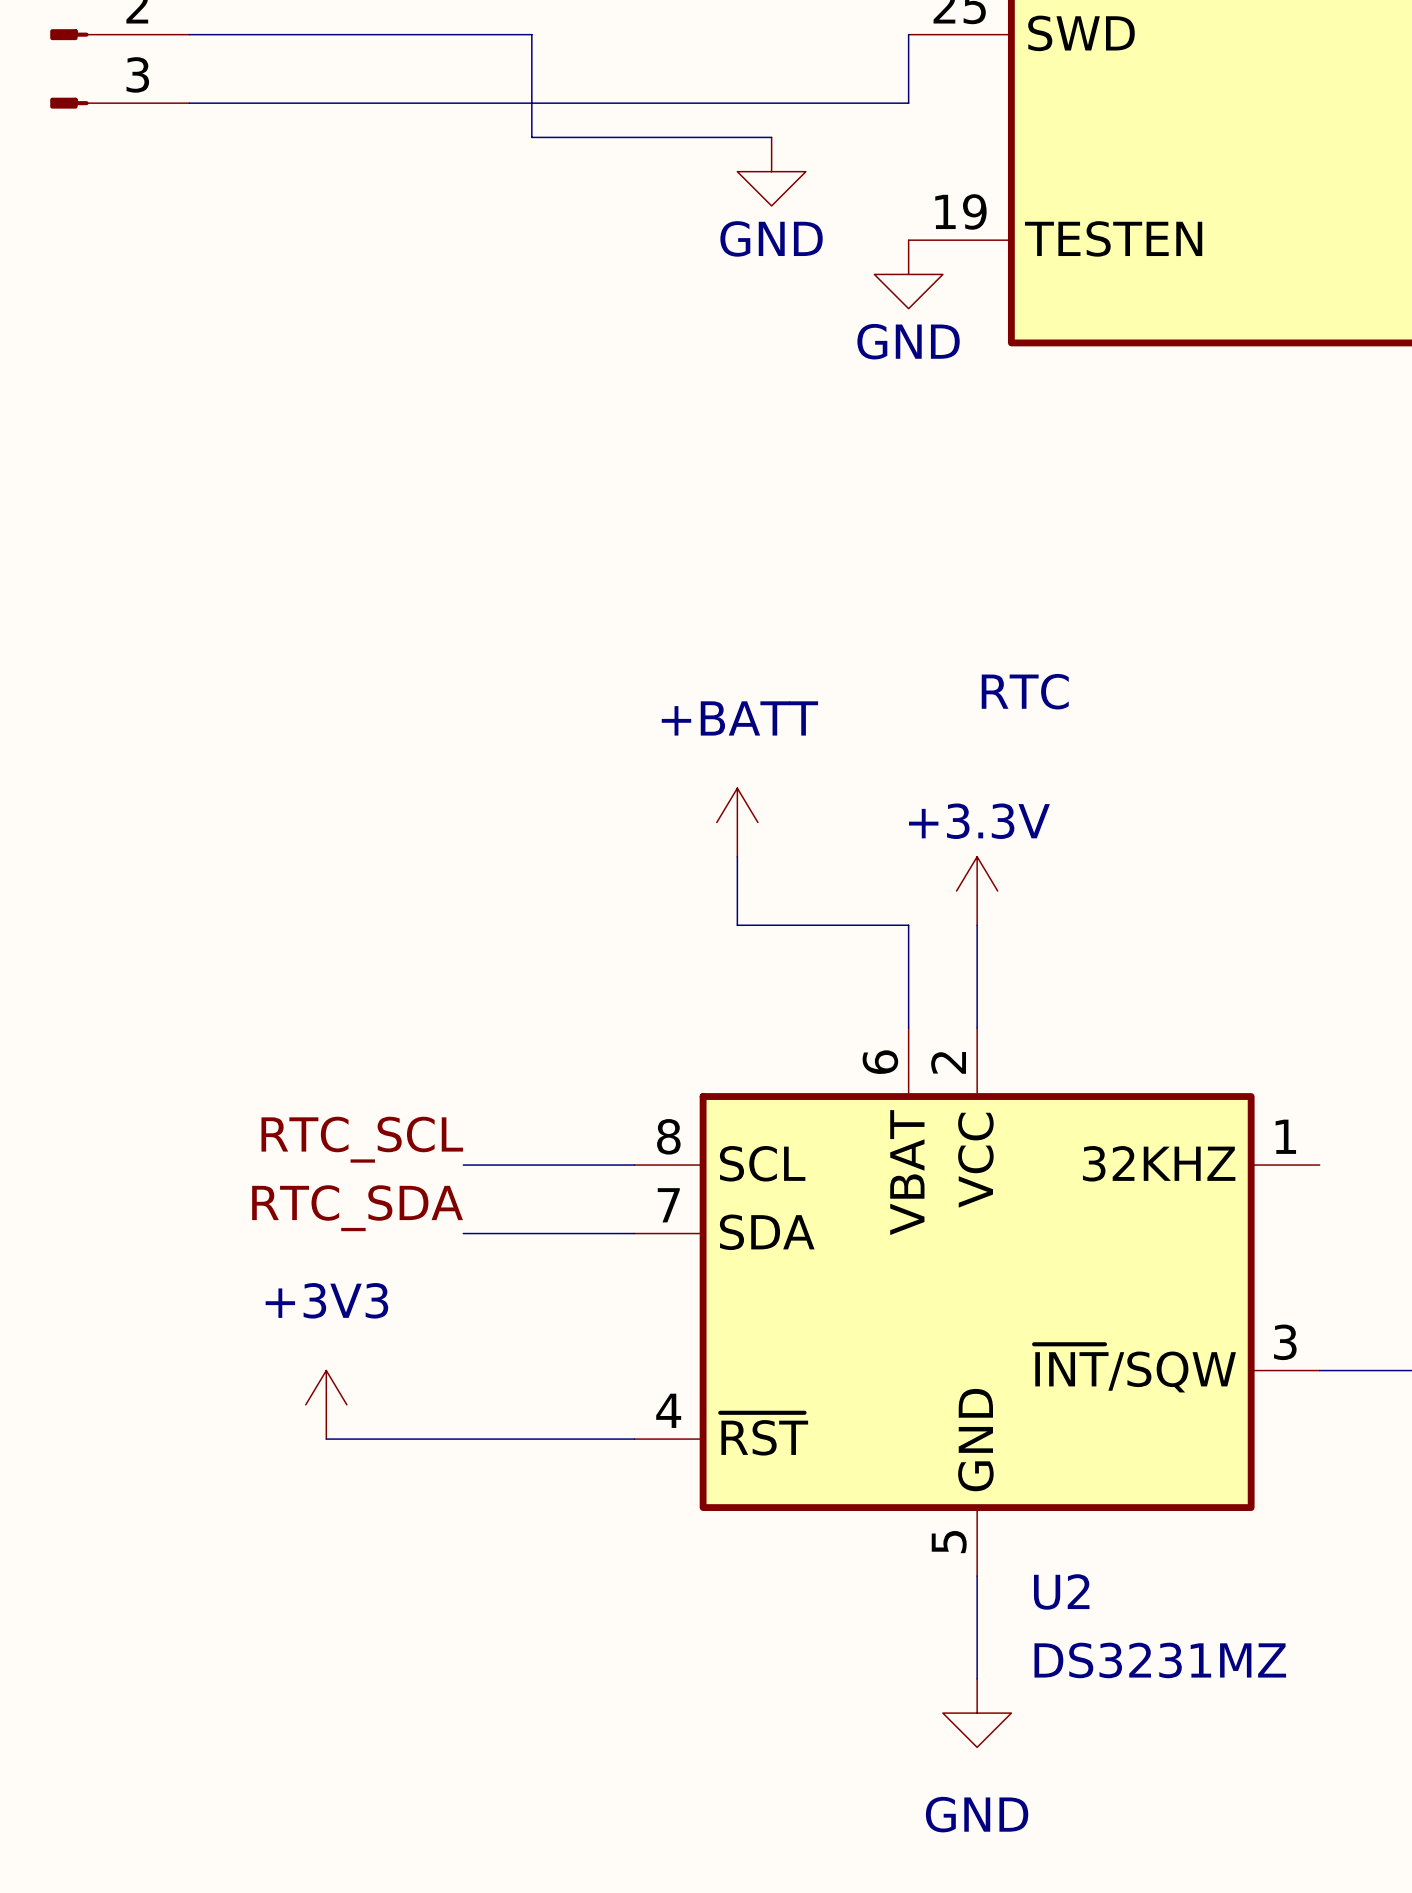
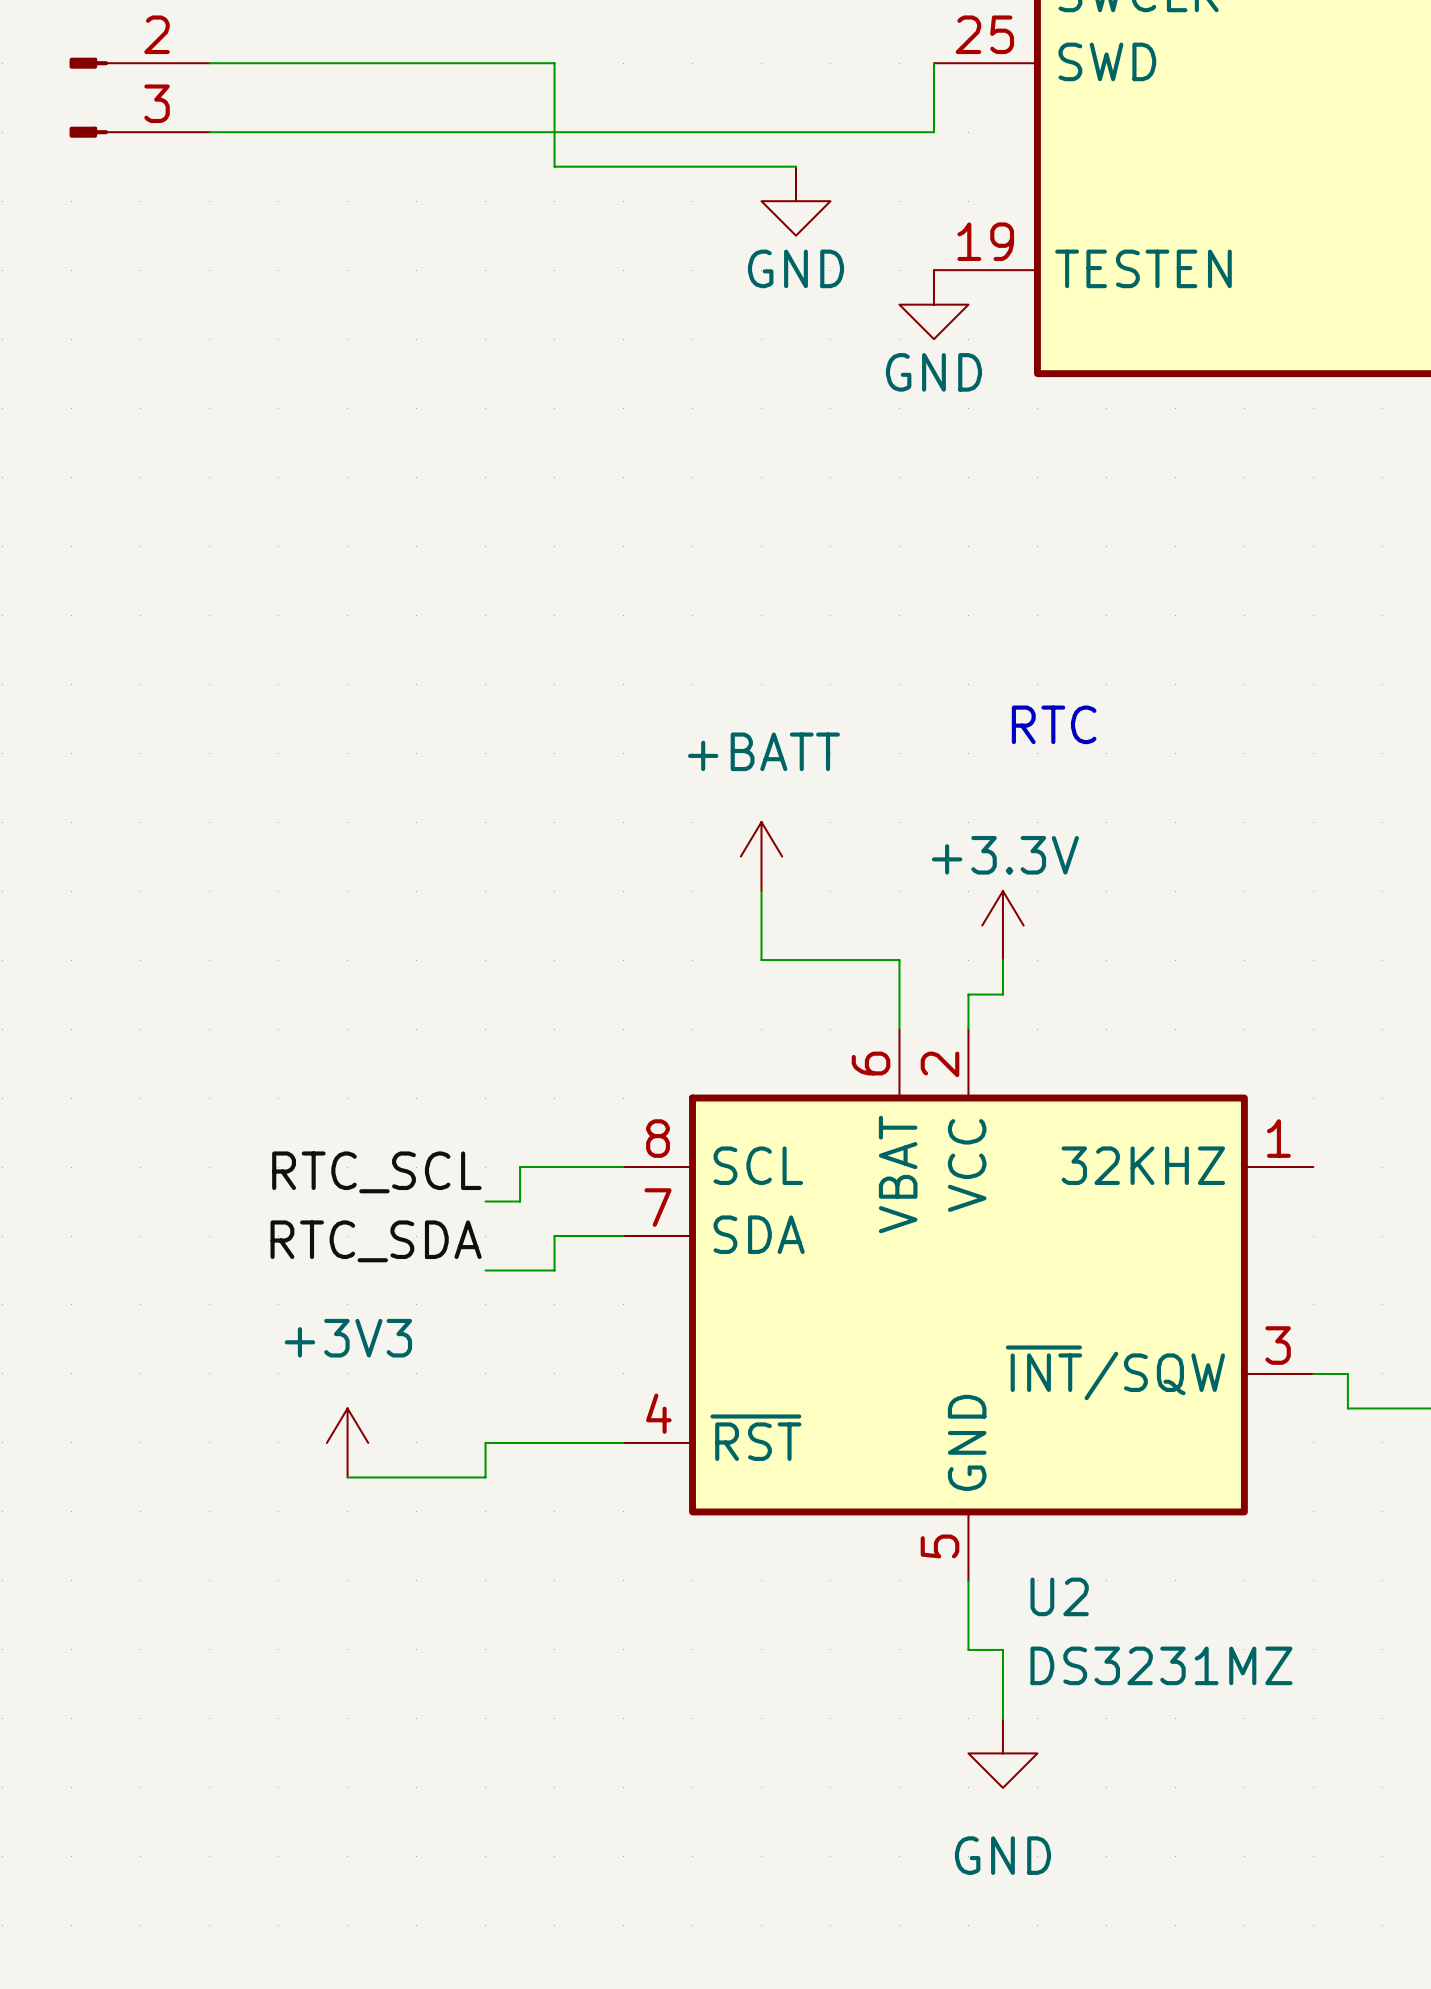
wire: (874, 925) (908, 925) (908, 1028) -> (899, 960) (899, 1029)
wire: (977, 959) (977, 1028) -> (1002, 994) (968, 994) (968, 1029)
wire: (497, 1165) (634, 1165) -> (520, 1201) (520, 1167) (623, 1167)
wire: (531, 1233) (634, 1233) -> (554, 1270) (554, 1236) (623, 1236)
U2 position: (977, 1302) -> (968, 1304)
wire: none -> (1313, 1373) (1347, 1373) (1347, 1408)
wire: (463, 1439) (634, 1439) -> (485, 1477) (485, 1442) (623, 1442)
wire: (977, 1576) (977, 1610) -> (968, 1580) (968, 1649) (1002, 1649)

